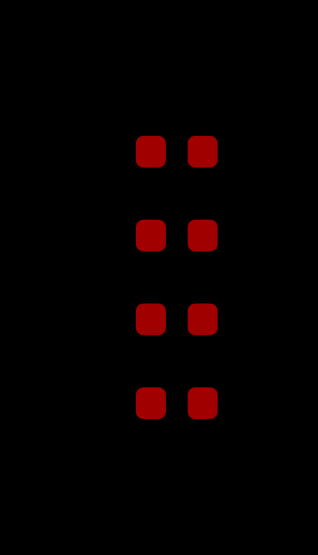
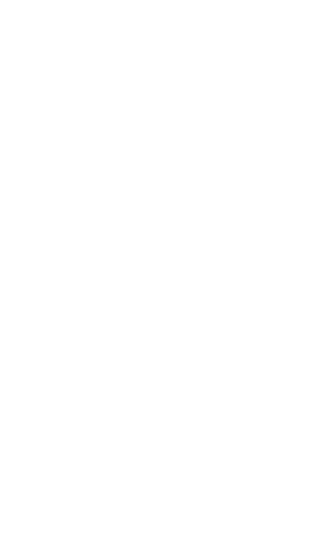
part: (176, 151) -> none
part: (176, 235) -> none
part: (176, 319) -> none
part: (176, 403) -> none

